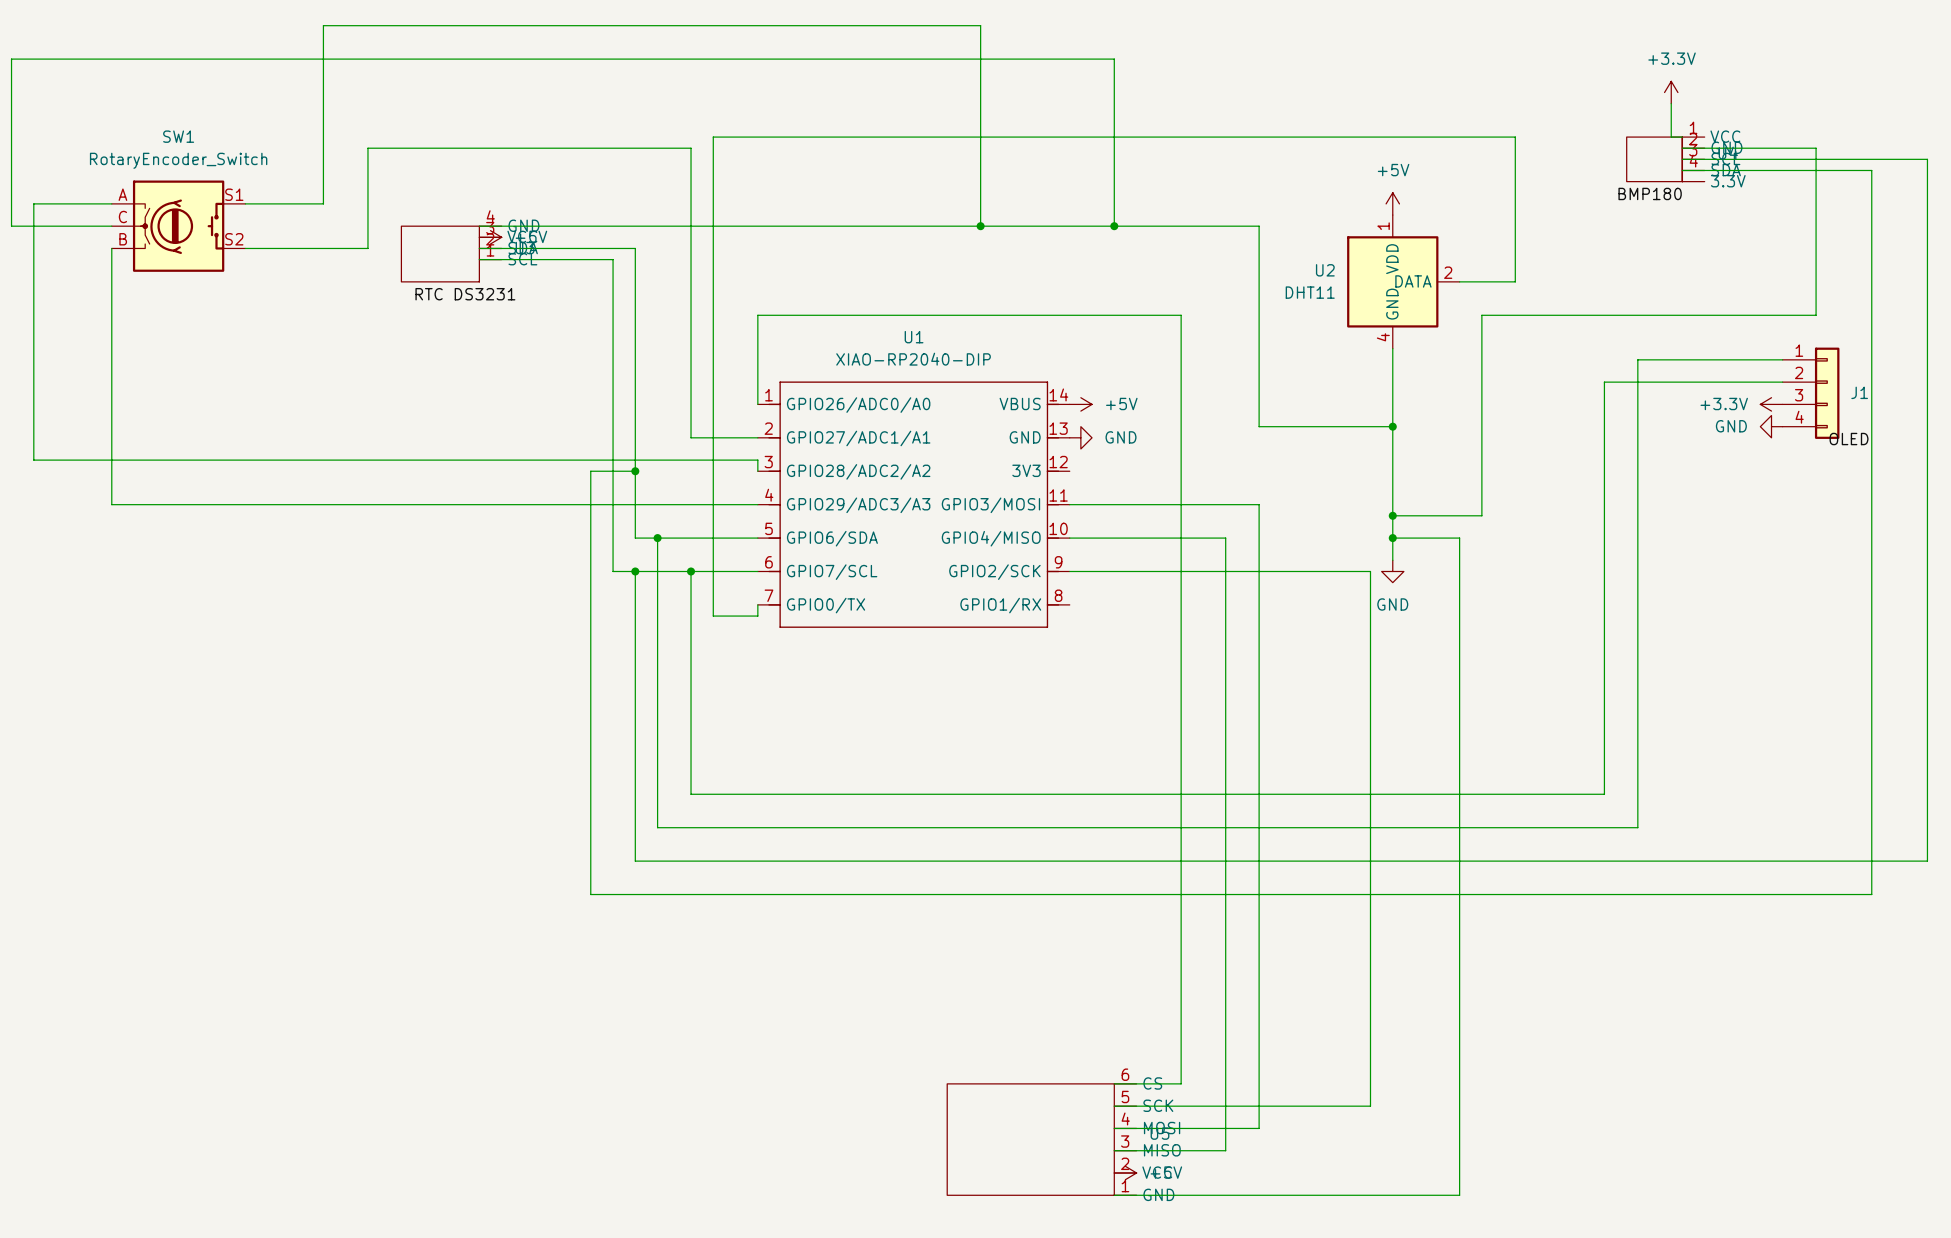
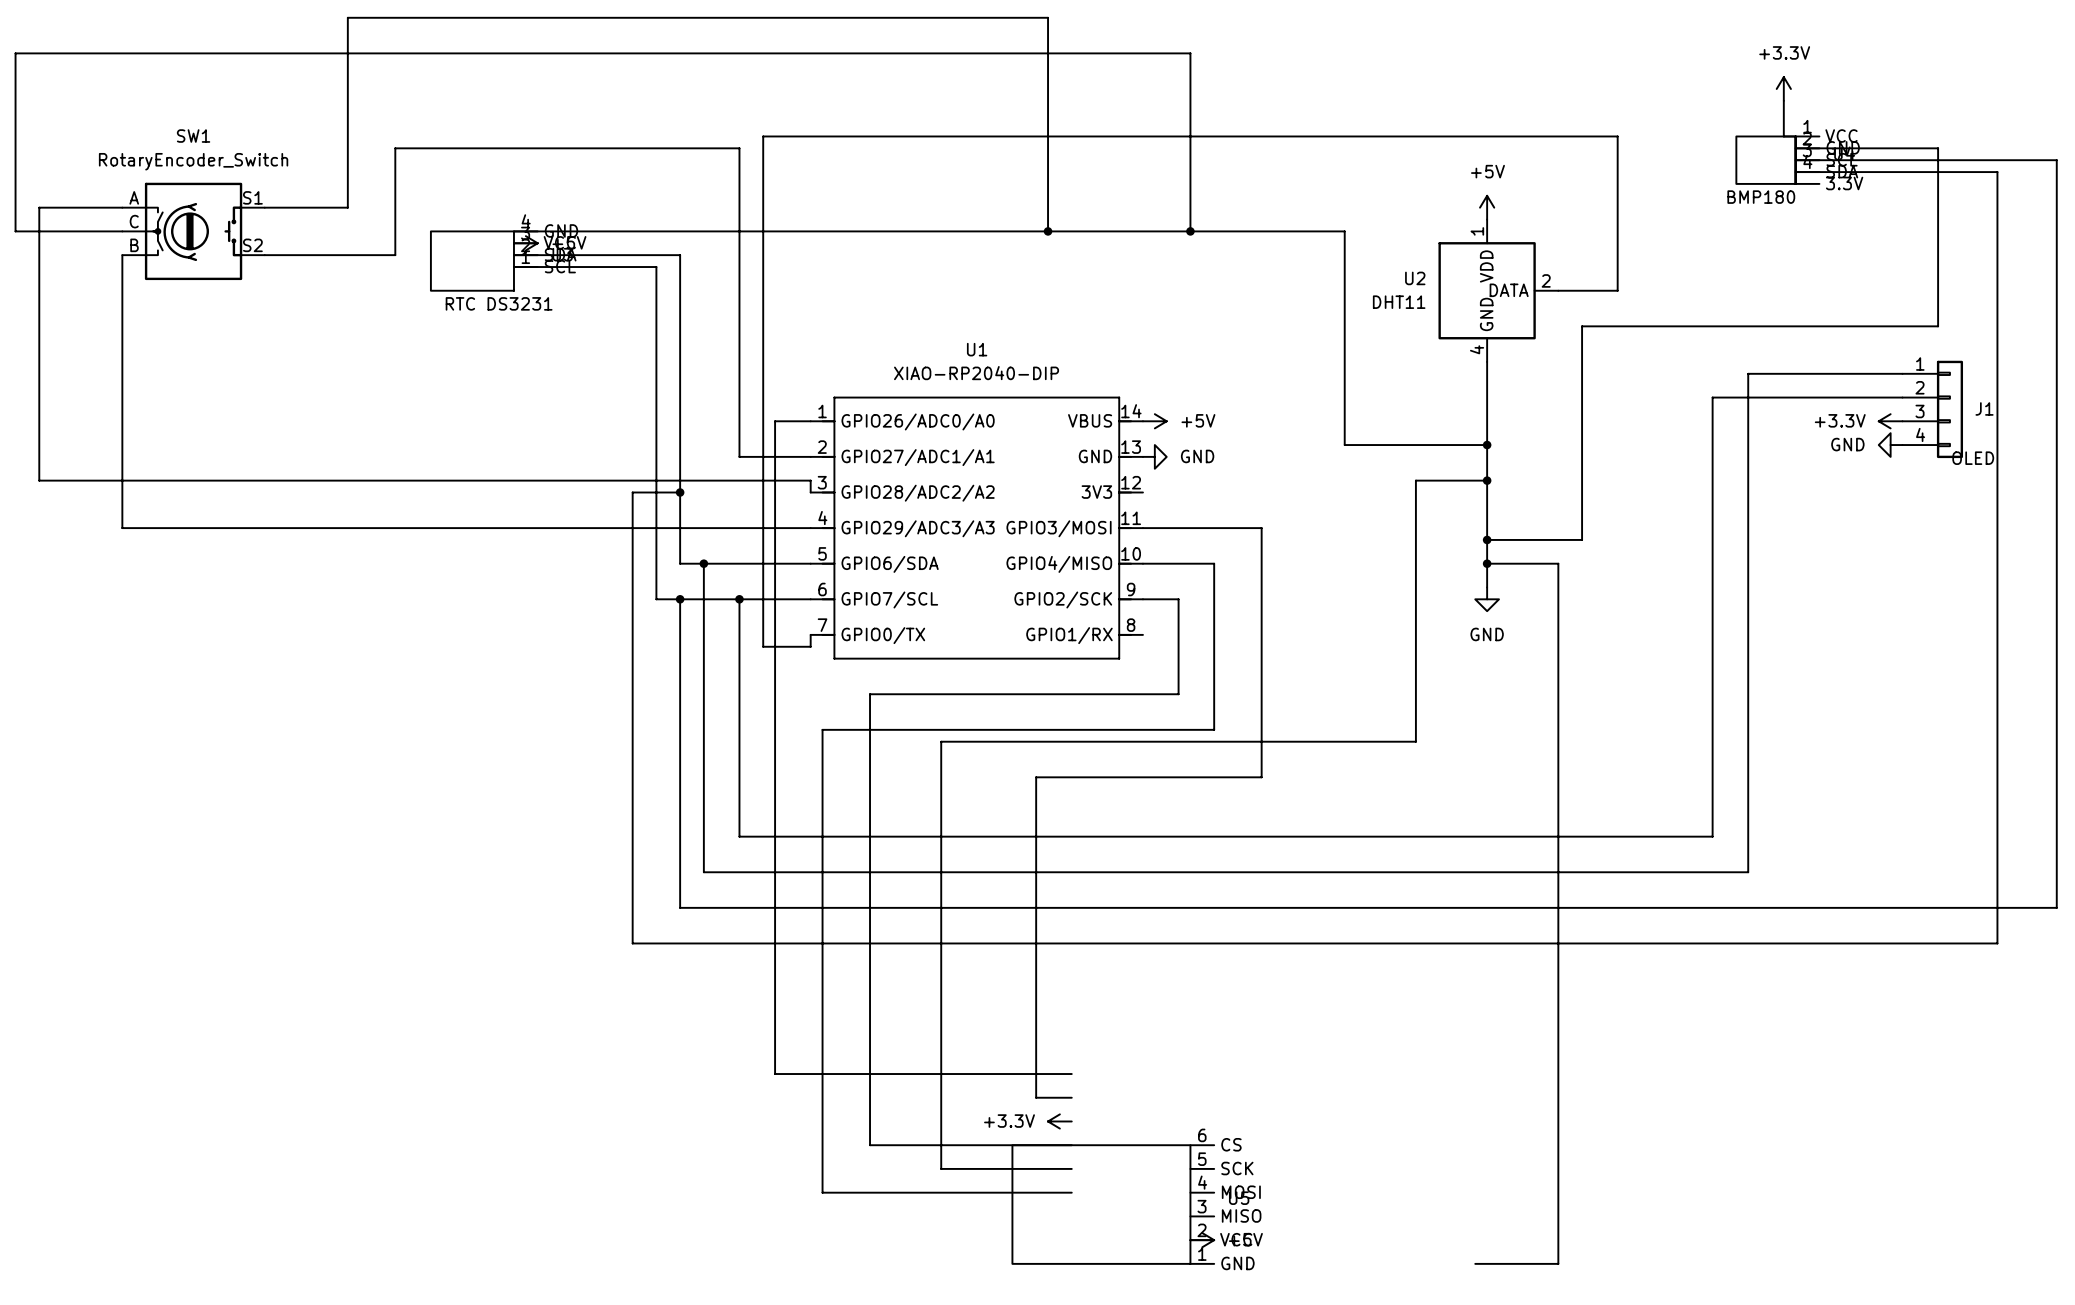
wire: (757, 404) (757, 315) (1181, 315) (1181, 504) (1259, 504) (1259, 1128) (1114, 1128) -> (810, 421) (775, 421) (775, 1074) (1071, 1074)
wire: none -> (1487, 480) (1415, 480) (1415, 741) (941, 741) (941, 1168) (1071, 1168)
junction: none -> (1487, 480)
wire: (1136, 538) (1225, 538) (1225, 1150) (1114, 1150) -> (1214, 563) (1214, 729) (822, 729) (822, 1192) (1071, 1192)
wire: (1103, 571) (1370, 571) (1370, 1106) (1114, 1106) -> (1178, 599) (1178, 694) (870, 694) (870, 1145) (1071, 1145)
wire: (1181, 738) (1181, 1083) (1114, 1083) -> (1261, 777) (1036, 777) (1036, 1097) (1071, 1097)
power symbol: none -> +3.3V (1059, 1121)
wire: (1114, 1195) (1381, 1195) -> none

